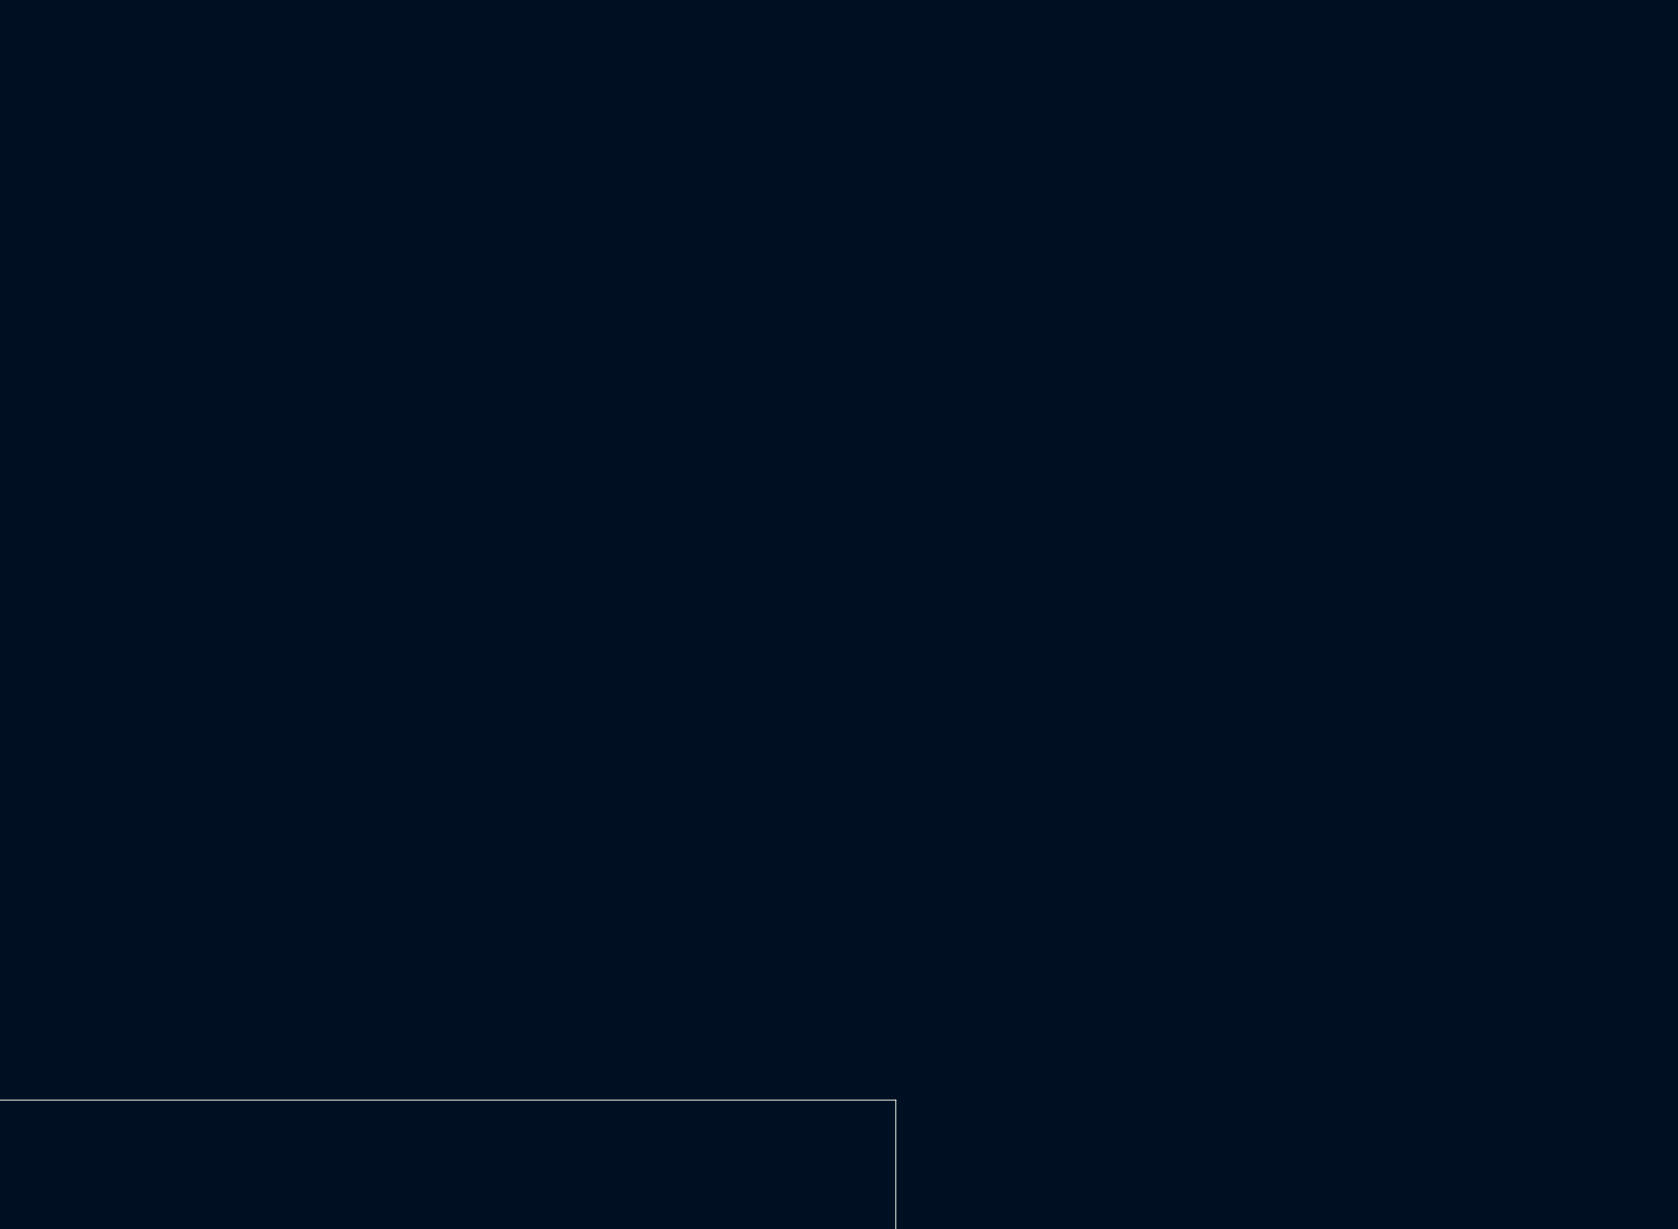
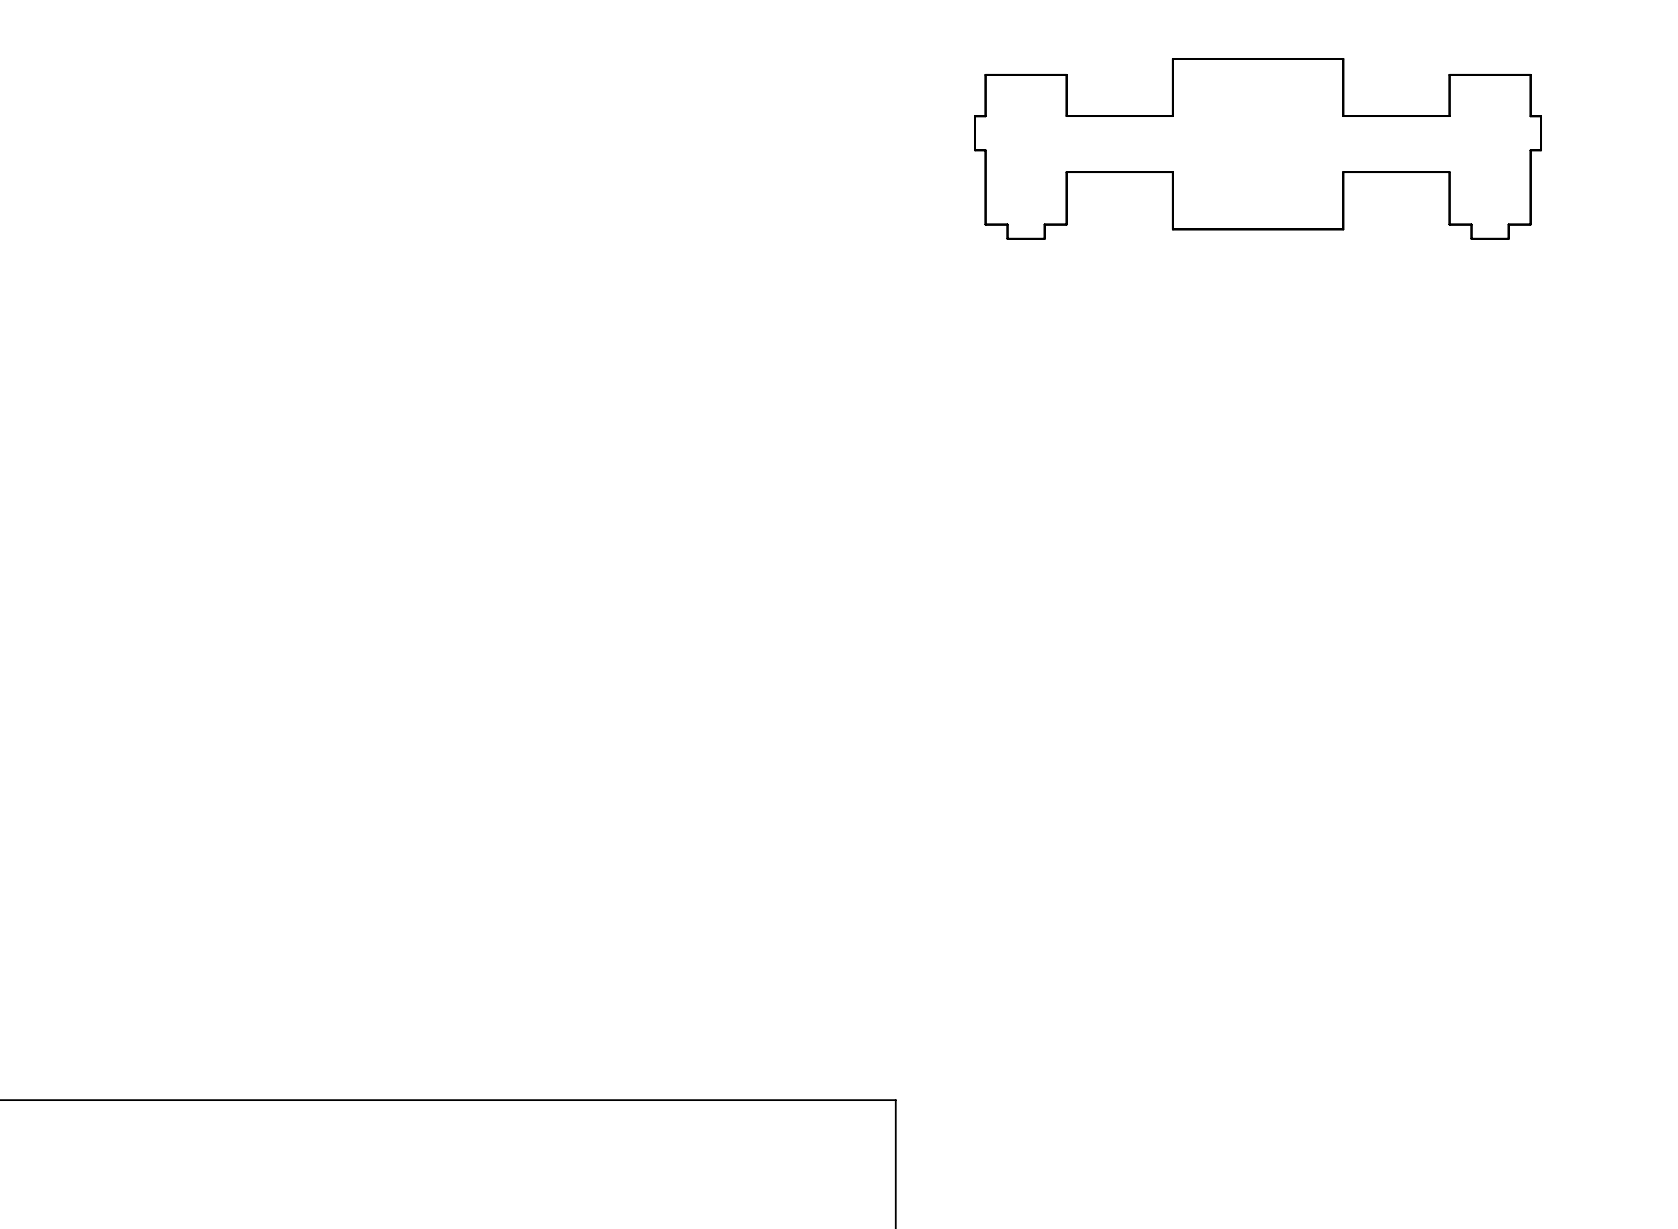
drawing: none -> [974, 58, 1542, 240]

